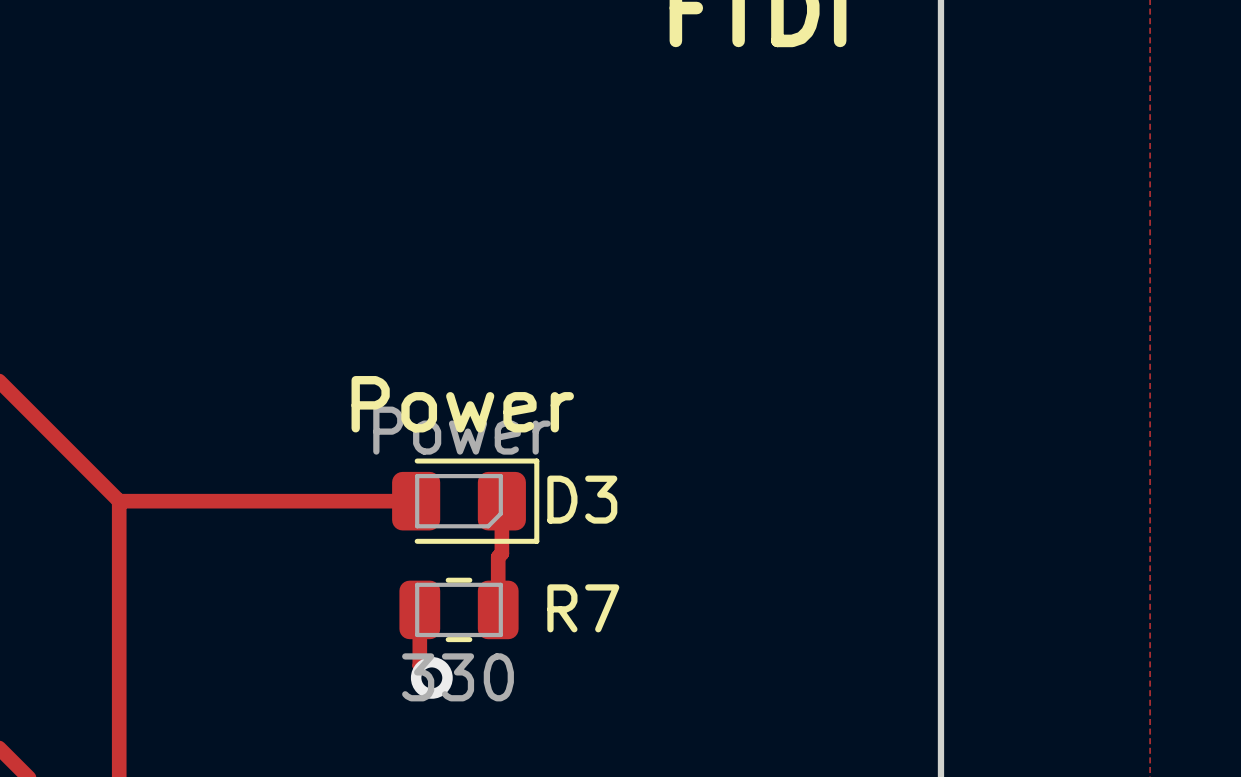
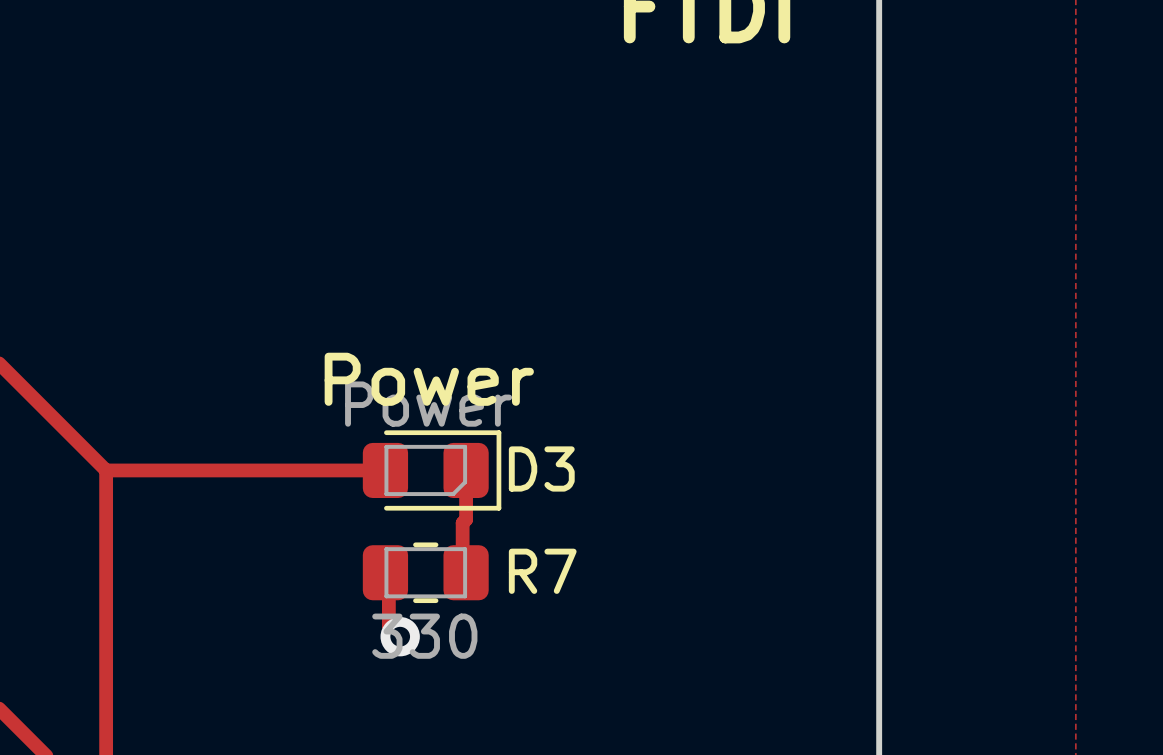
R7 footprint: [399, 577, 519, 643] -> [362, 542, 489, 604]

